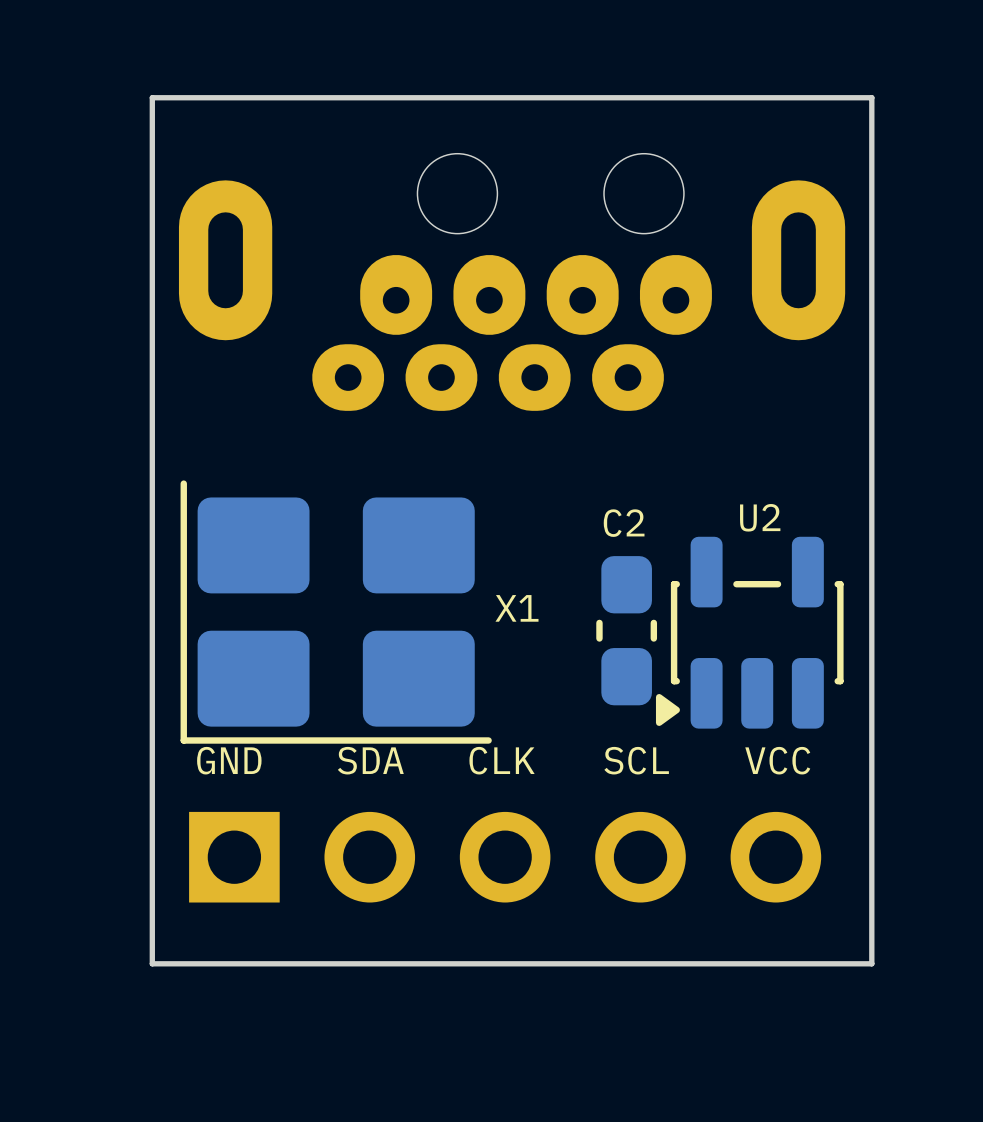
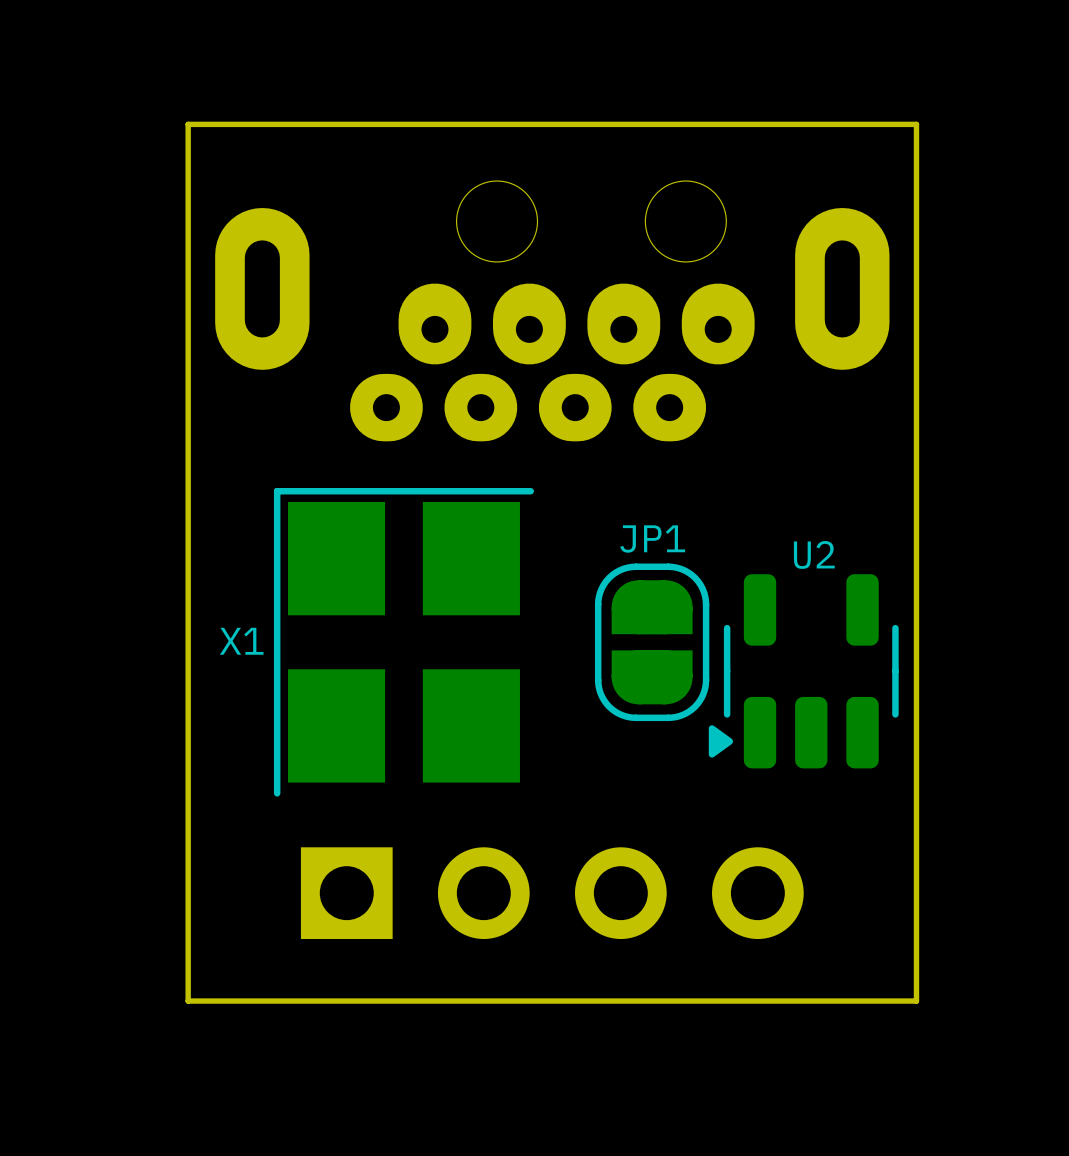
X1 footprint: [180, 480, 492, 744] -> [273, 487, 534, 797]
U2 footprint: [655, 536, 844, 729] -> [708, 574, 899, 769]
X1 name position: X1 (516, 608) -> X1 (241, 641)
JP1: none -> (652, 642)
C2: (626, 630) -> none
text: GND (229, 760) -> none
text: SDA (370, 760) -> none
text: CLK (502, 760) -> none
text: SCL (636, 760) -> none
text: VCC (777, 760) -> none
part footprint: [189, 811, 822, 903] -> [300, 847, 804, 940]

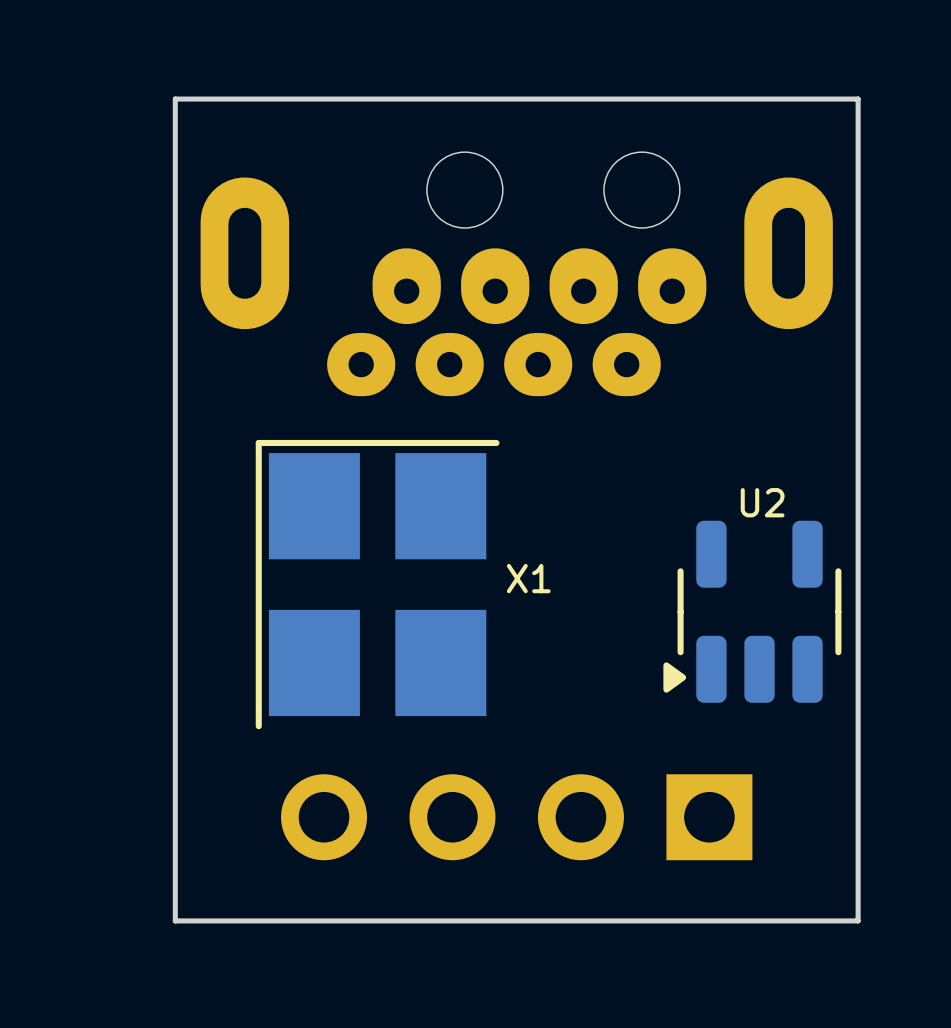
X1 name position: X1 (241, 641) -> X1 (528, 578)
JP1: (652, 642) -> none
part rotation: 0° (552, 893) -> 180° (516, 817)

